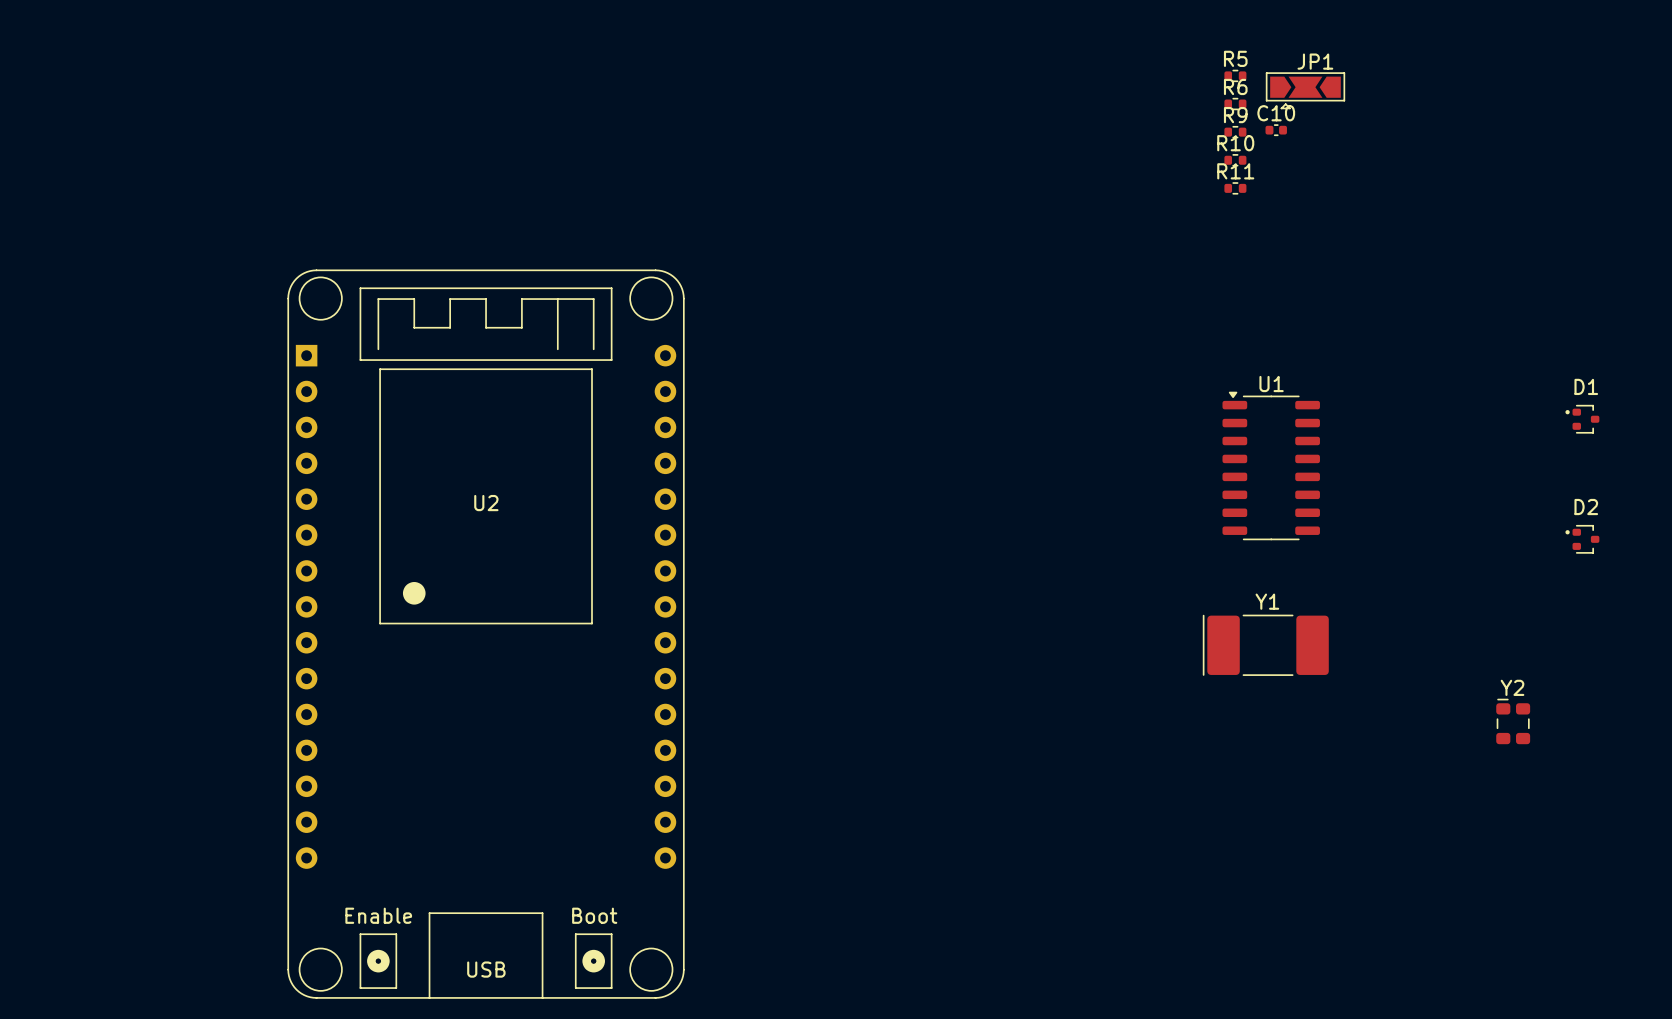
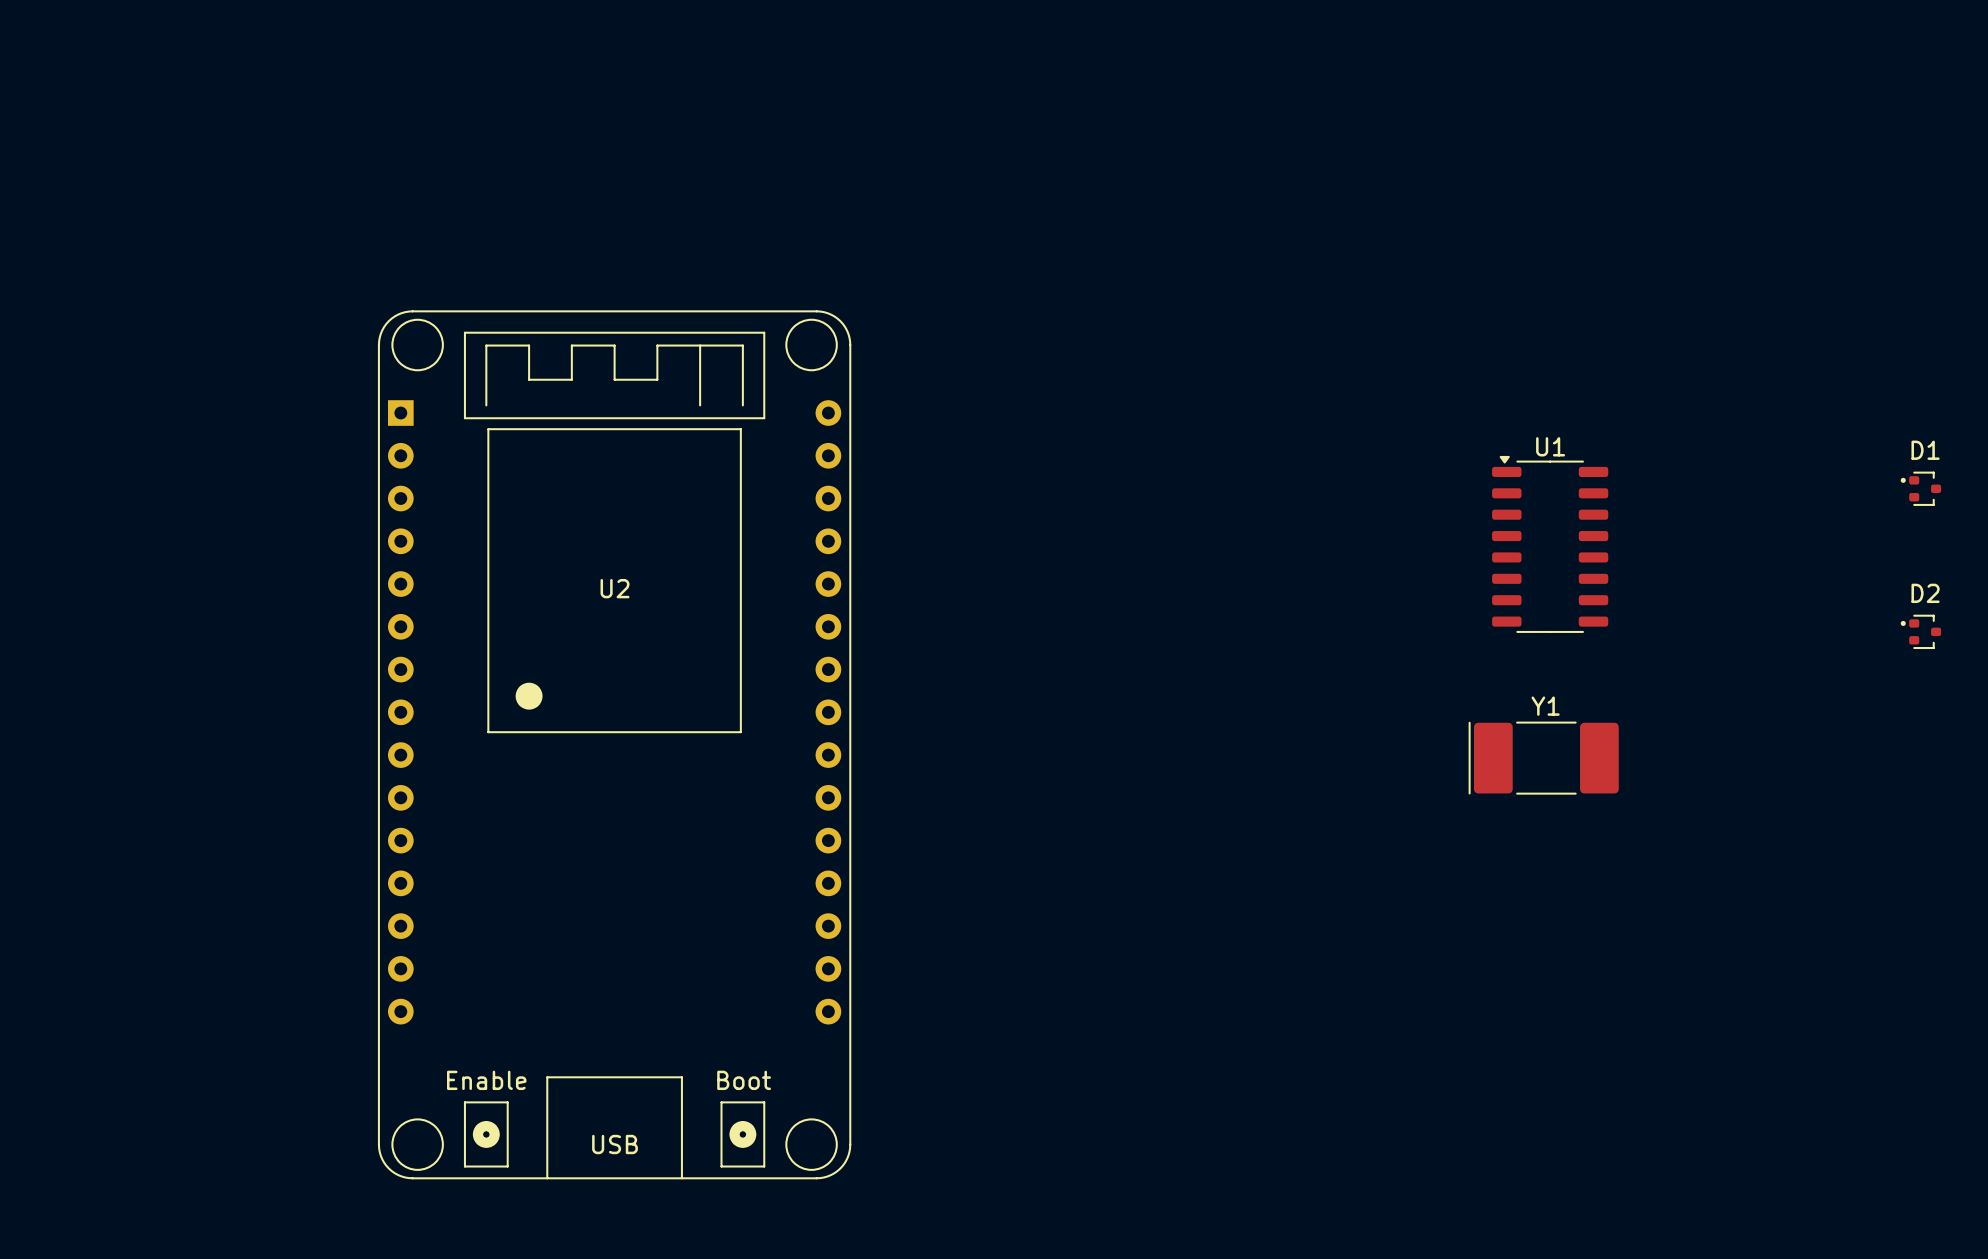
R5: (1235, 75) -> none
JP1: (1305, 90) -> none
R6: (1235, 104) -> none
C10: (1276, 130) -> none
R9: (1235, 132) -> none
R10: (1235, 160) -> none
R11: (1235, 188) -> none
Y2: (1513, 721) -> none

